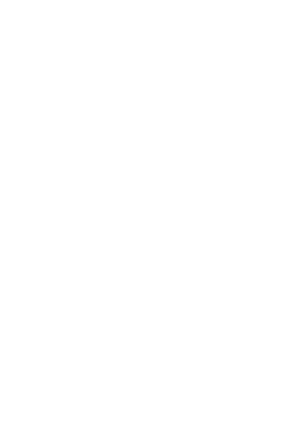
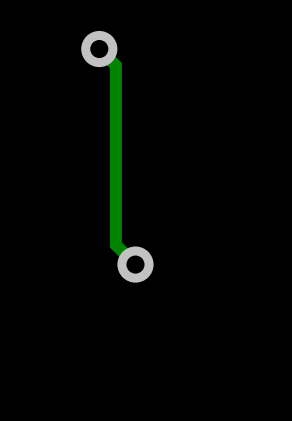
track: none -> (99, 49) (115, 65) (115, 244) (135, 264)
via: none -> (99, 49)
via: none -> (135, 264)

